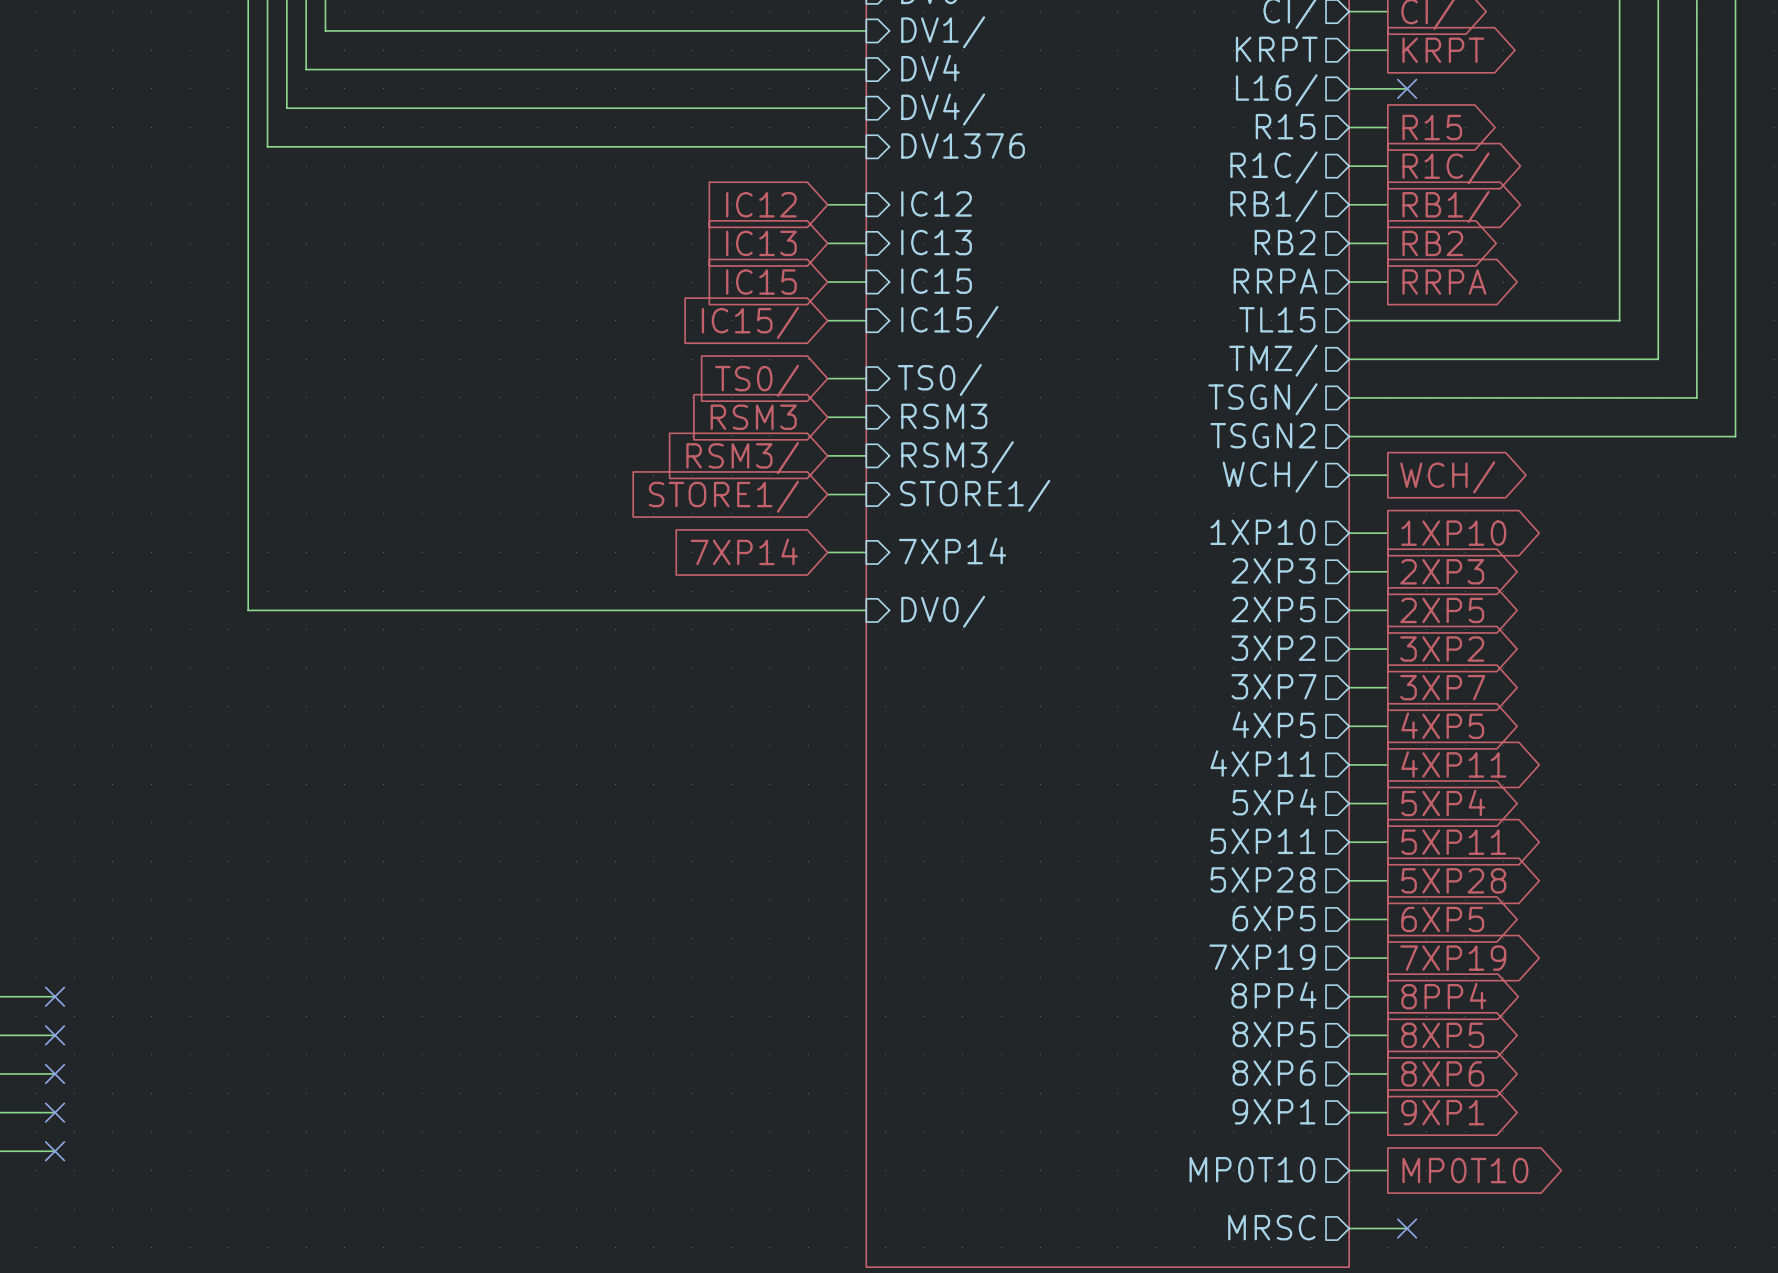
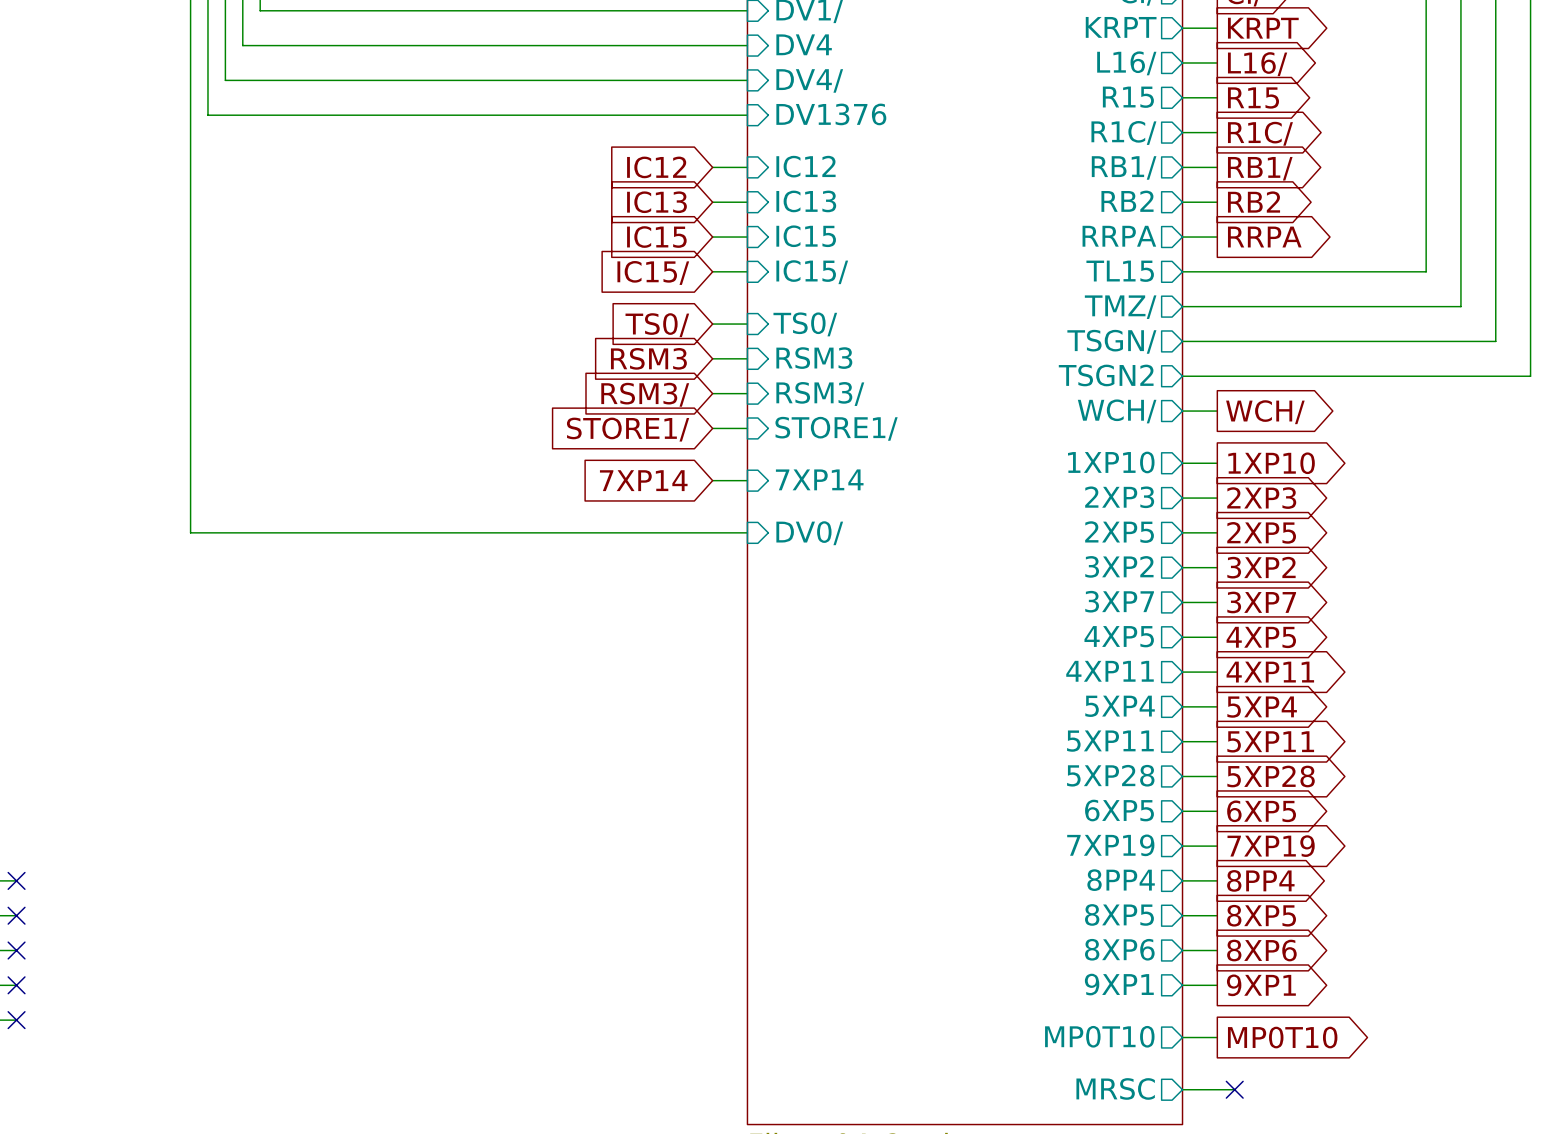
wire: (1387, 88) (1407, 88) -> none
no-connect mark: (1407, 88) -> none
global label: none -> L16/ (1257, 64)

